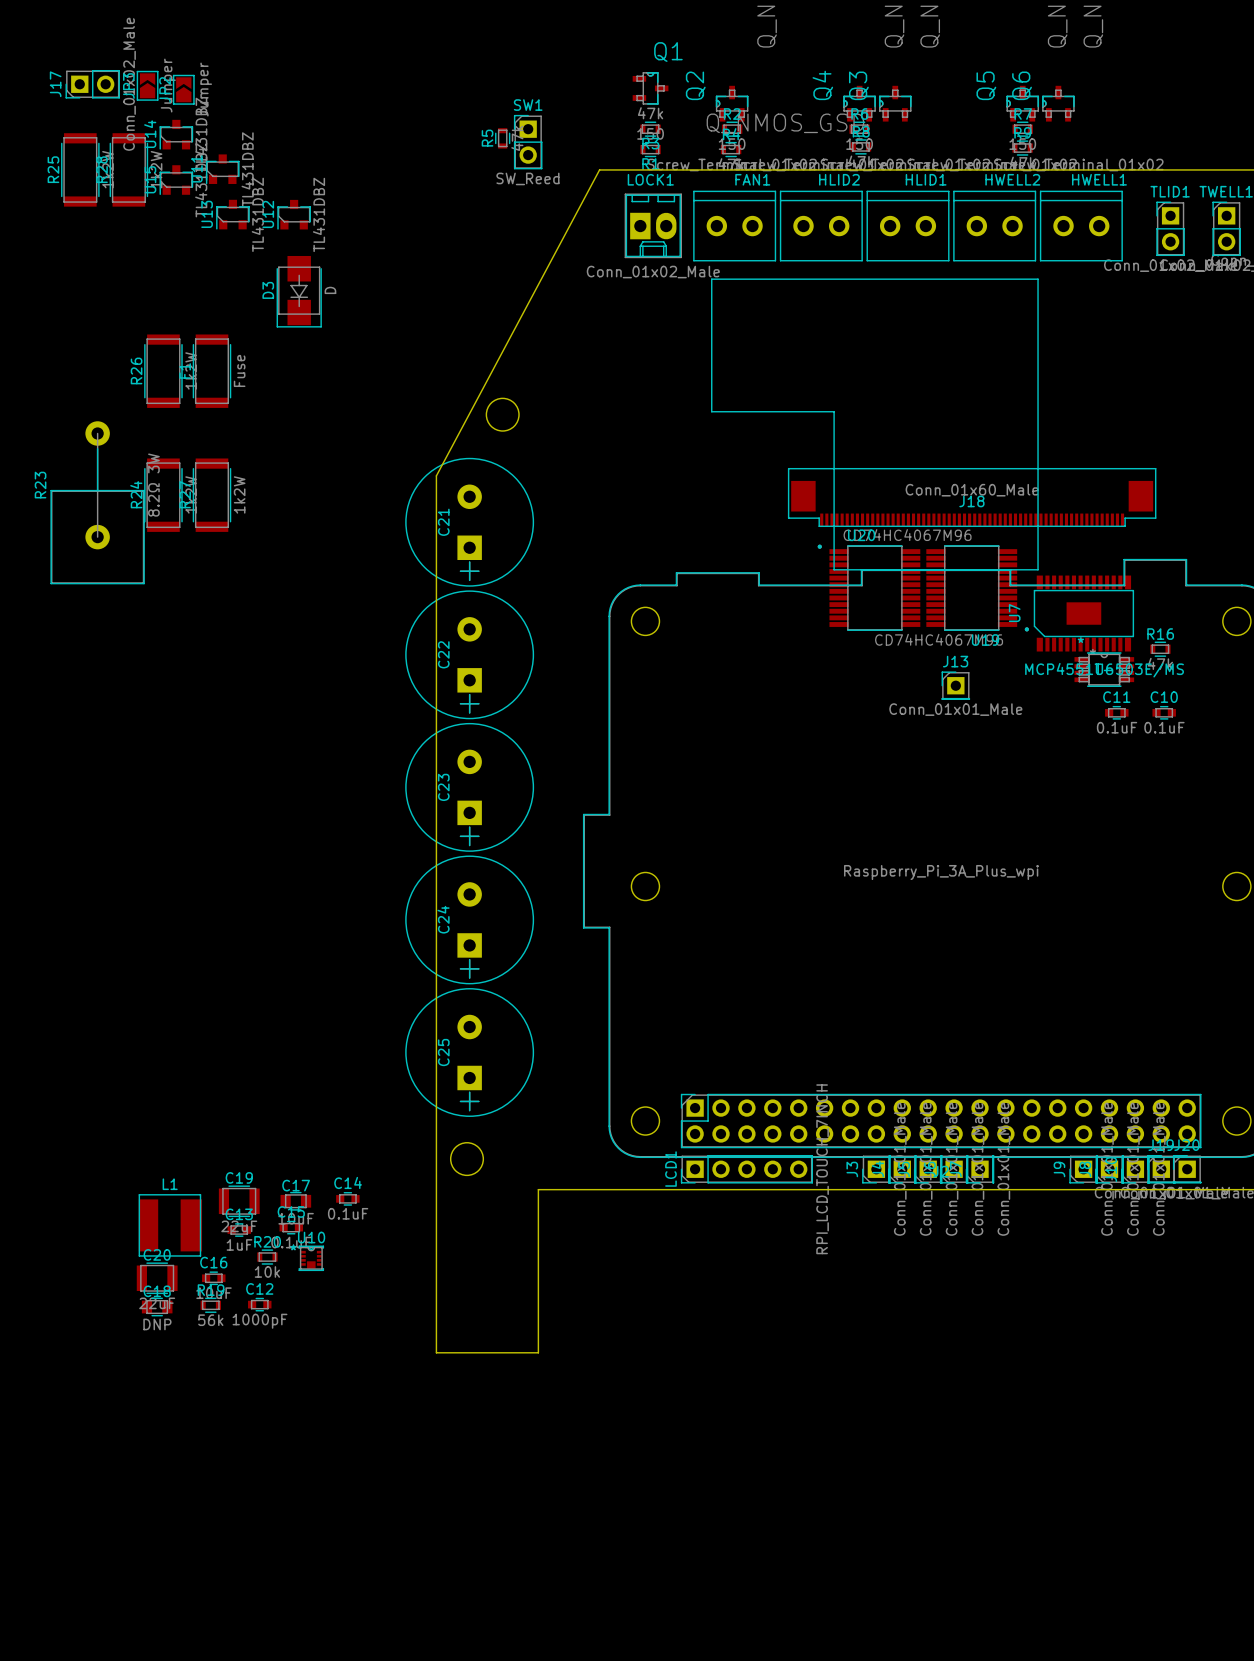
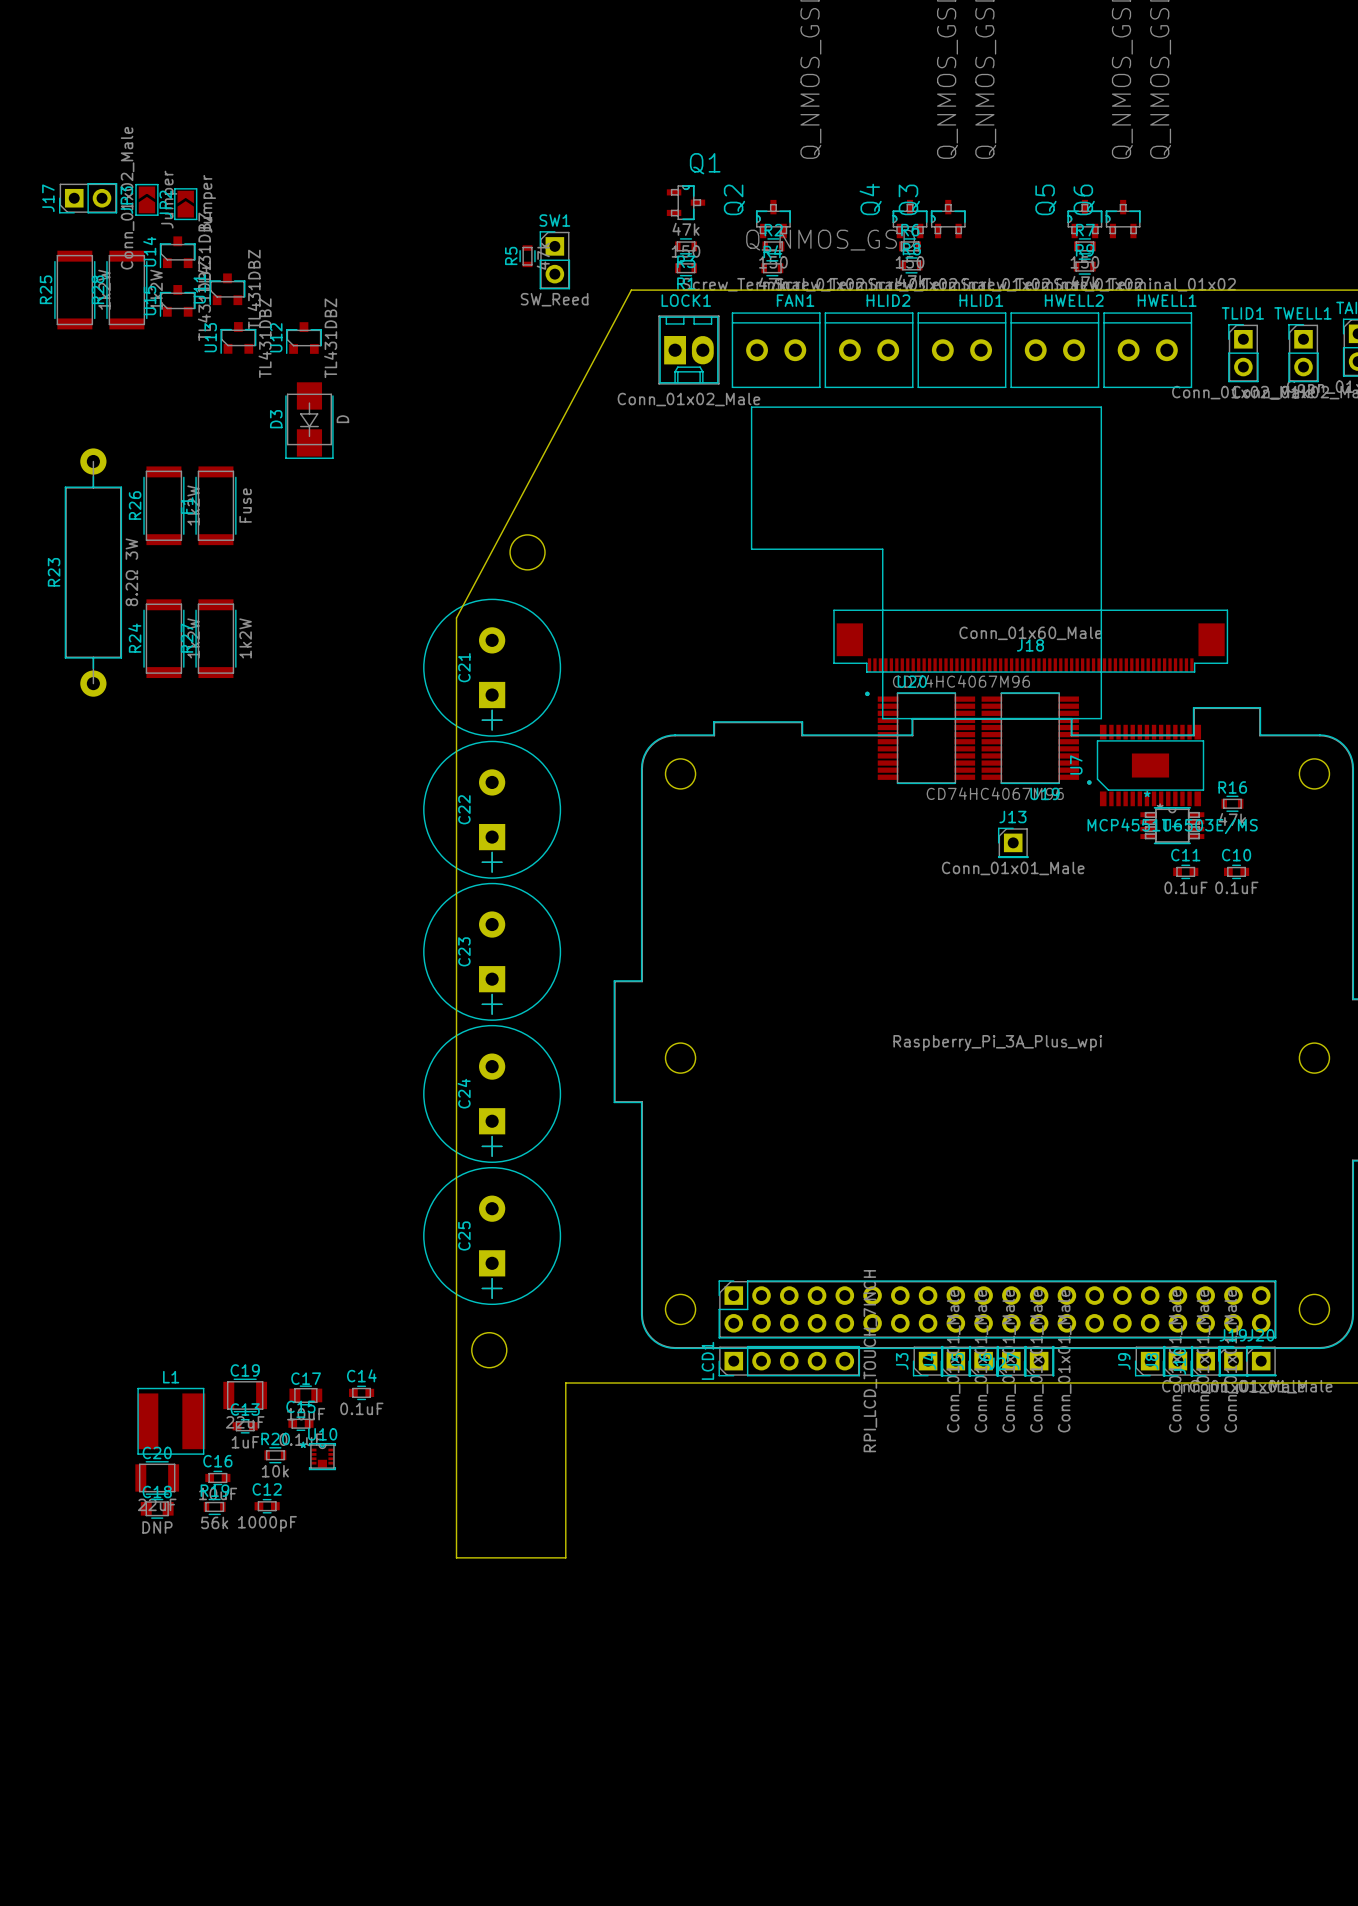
R23 footprint: [50, 421, 145, 585] -> [64, 448, 123, 697]
R23 name position: R23 (40, 485) -> R23 (54, 572)
R23 value position: 8.2Ω 3W (153, 485) -> 8.2Ω 3W (131, 572)

